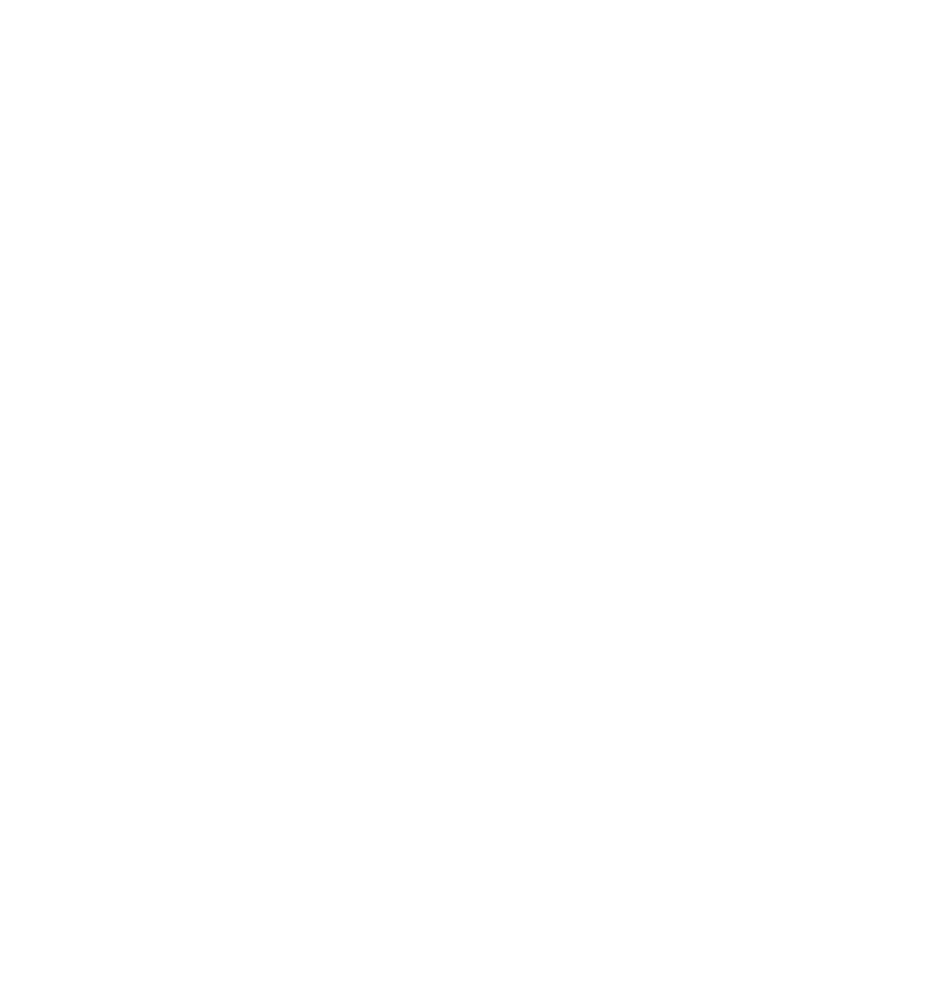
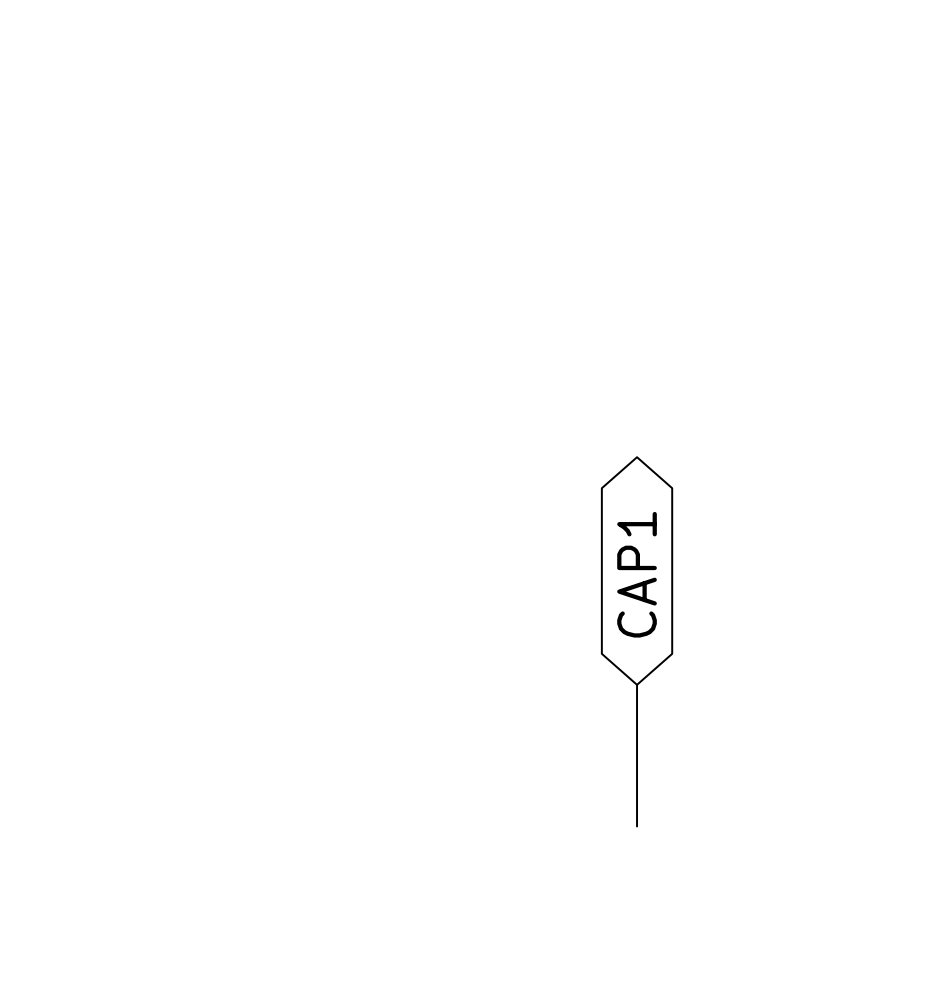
global label: none -> CAP1 (637, 574)
wire: none -> (637, 684) (637, 826)

